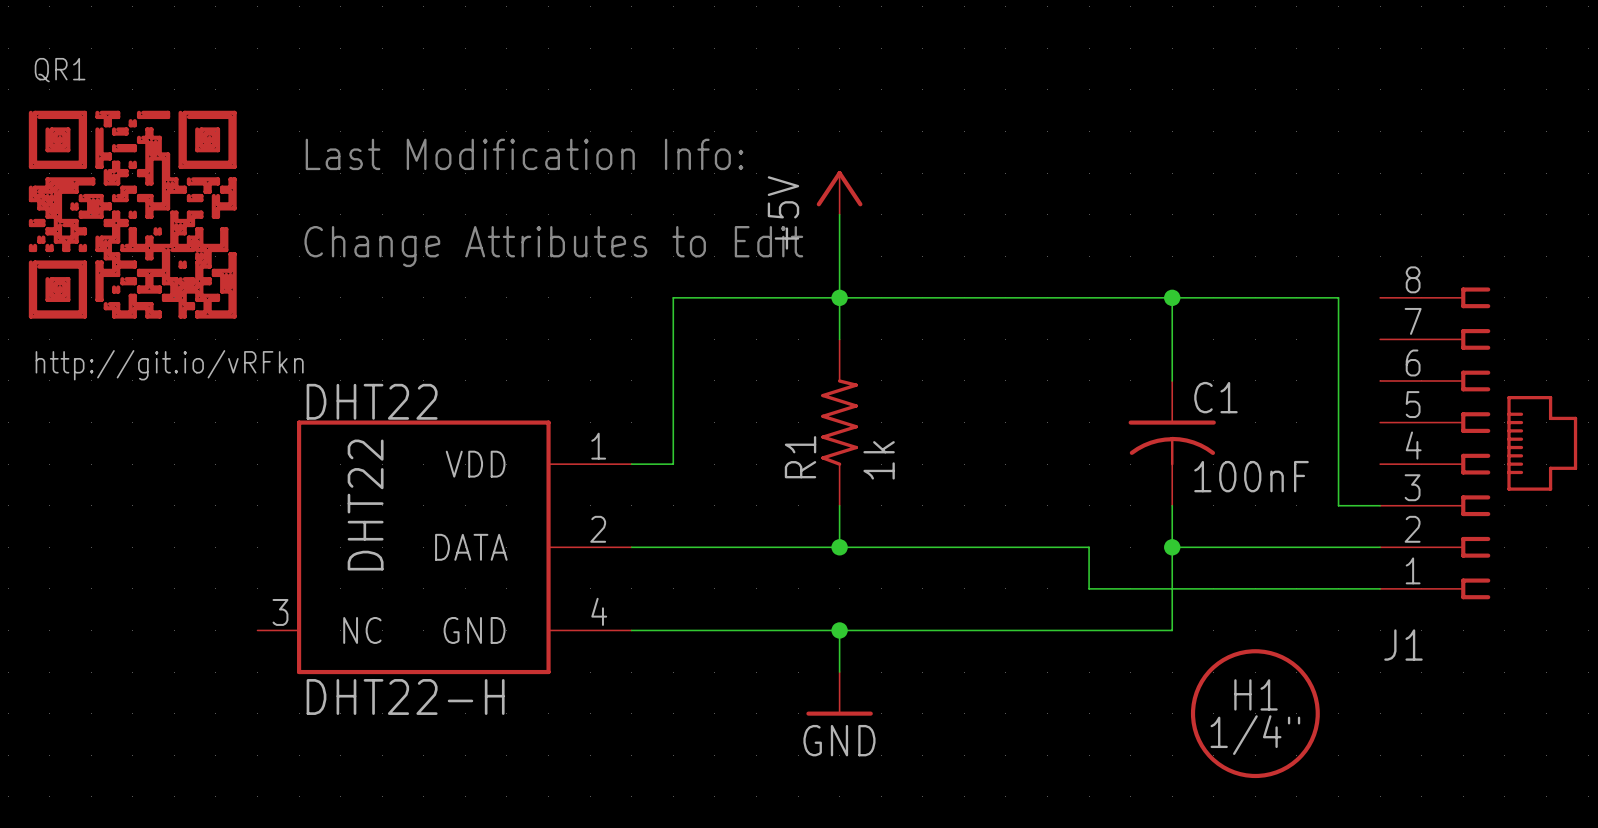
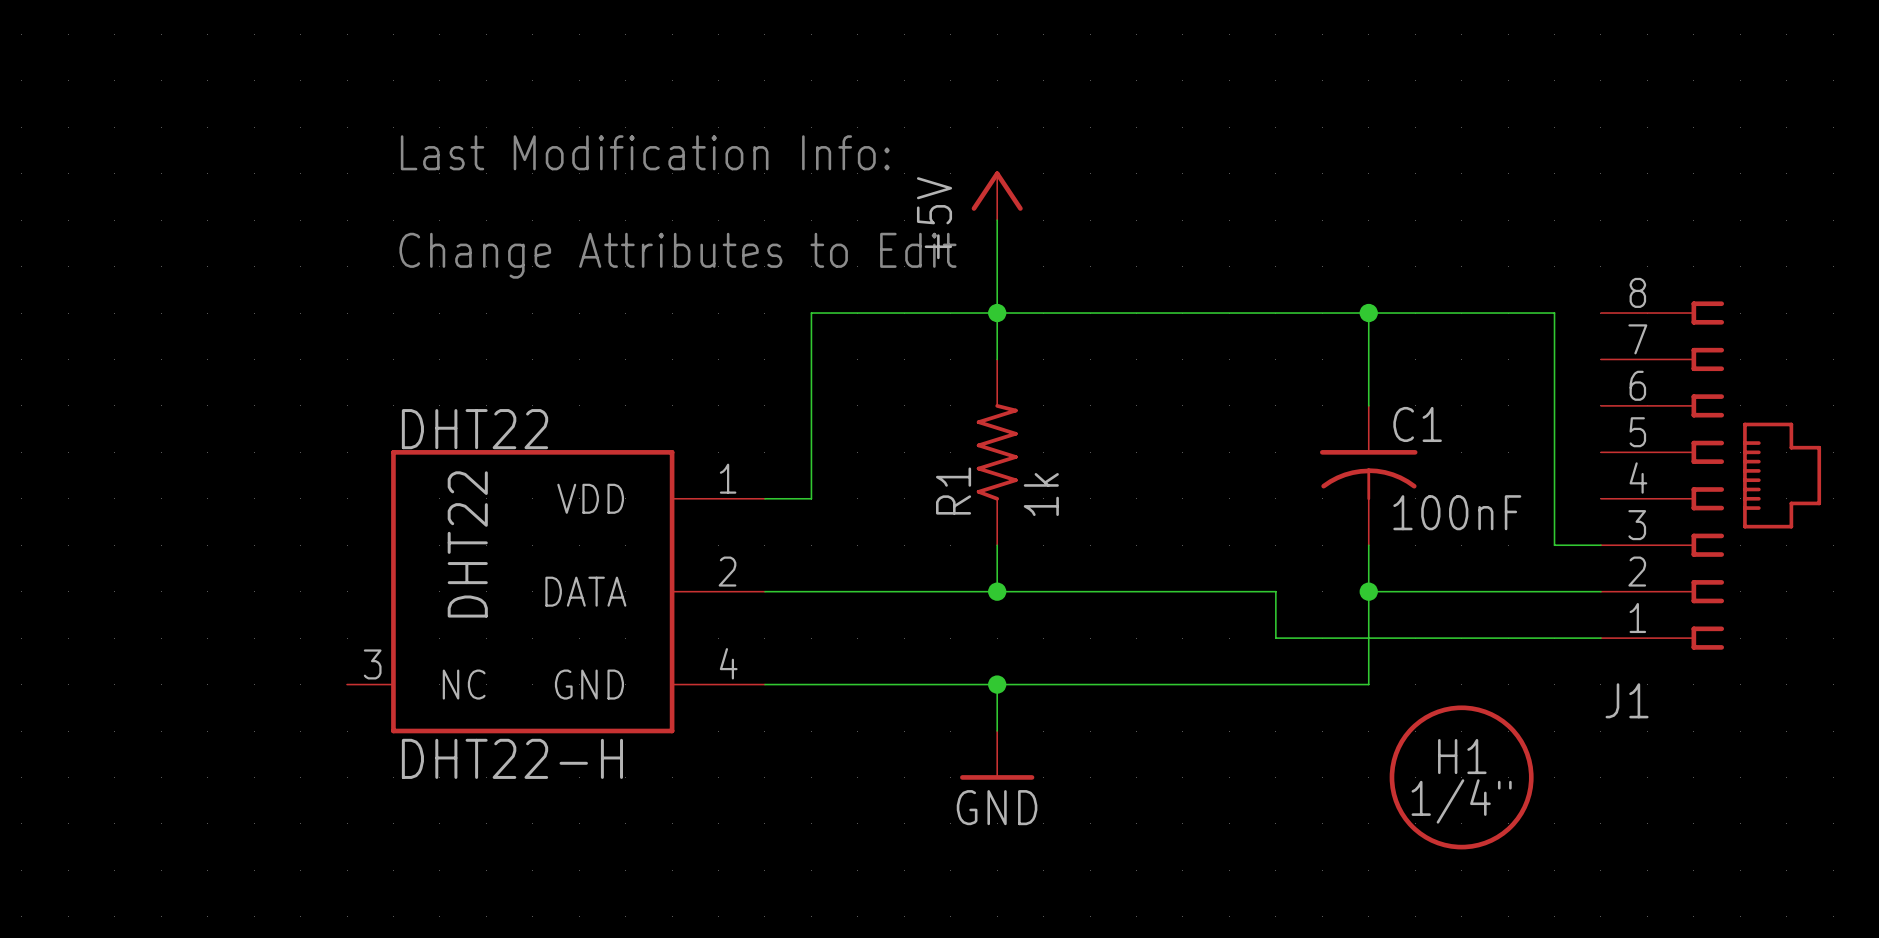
QR1: (132, 214) -> none

